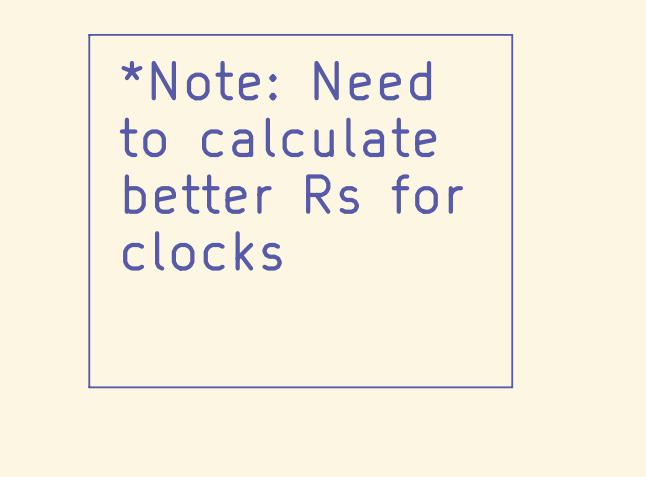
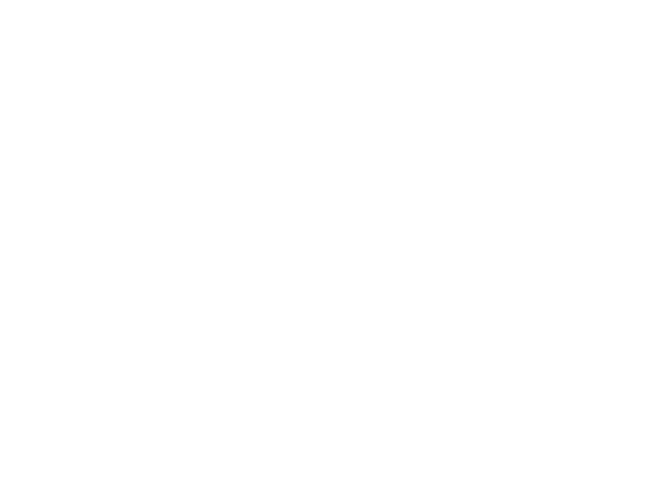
line: (89, 34) (512, 34) (512, 387) (89, 387) (89, 34) -> none
text: *Note: Need (276, 80) -> none
text: to calculate (277, 137) -> none
text: better Rs for (293, 194) -> none
text: clocks (202, 250) -> none

